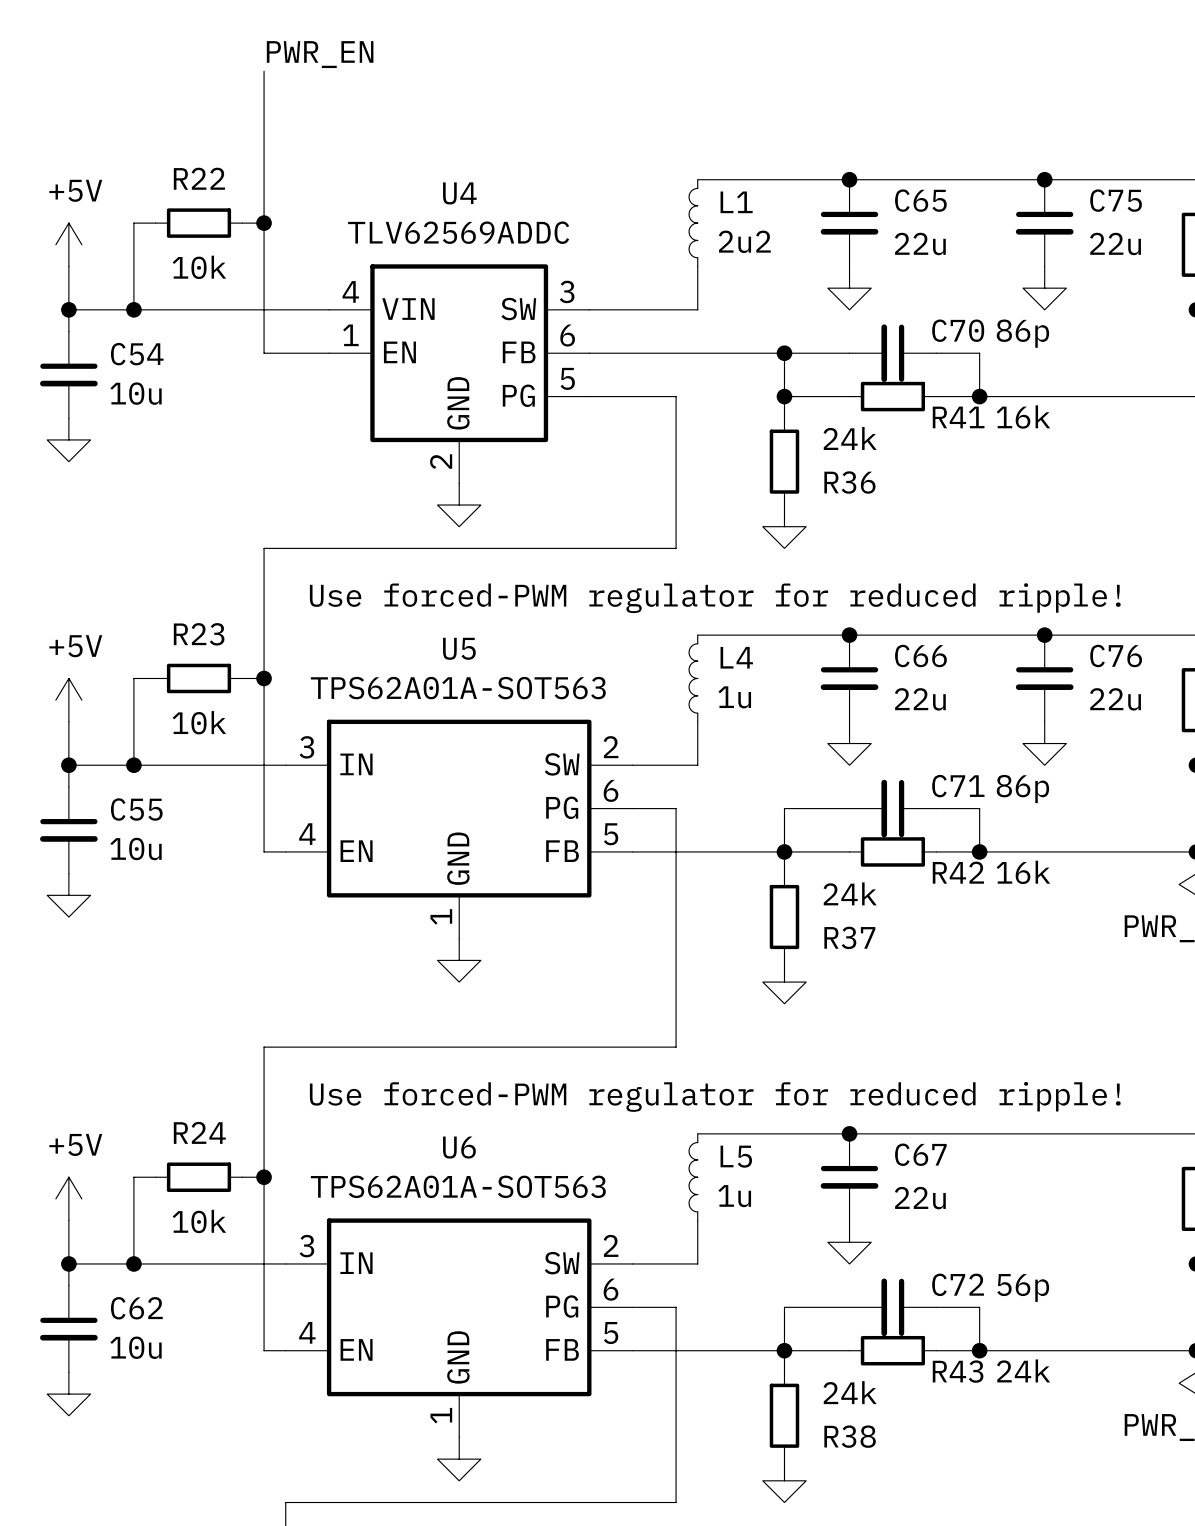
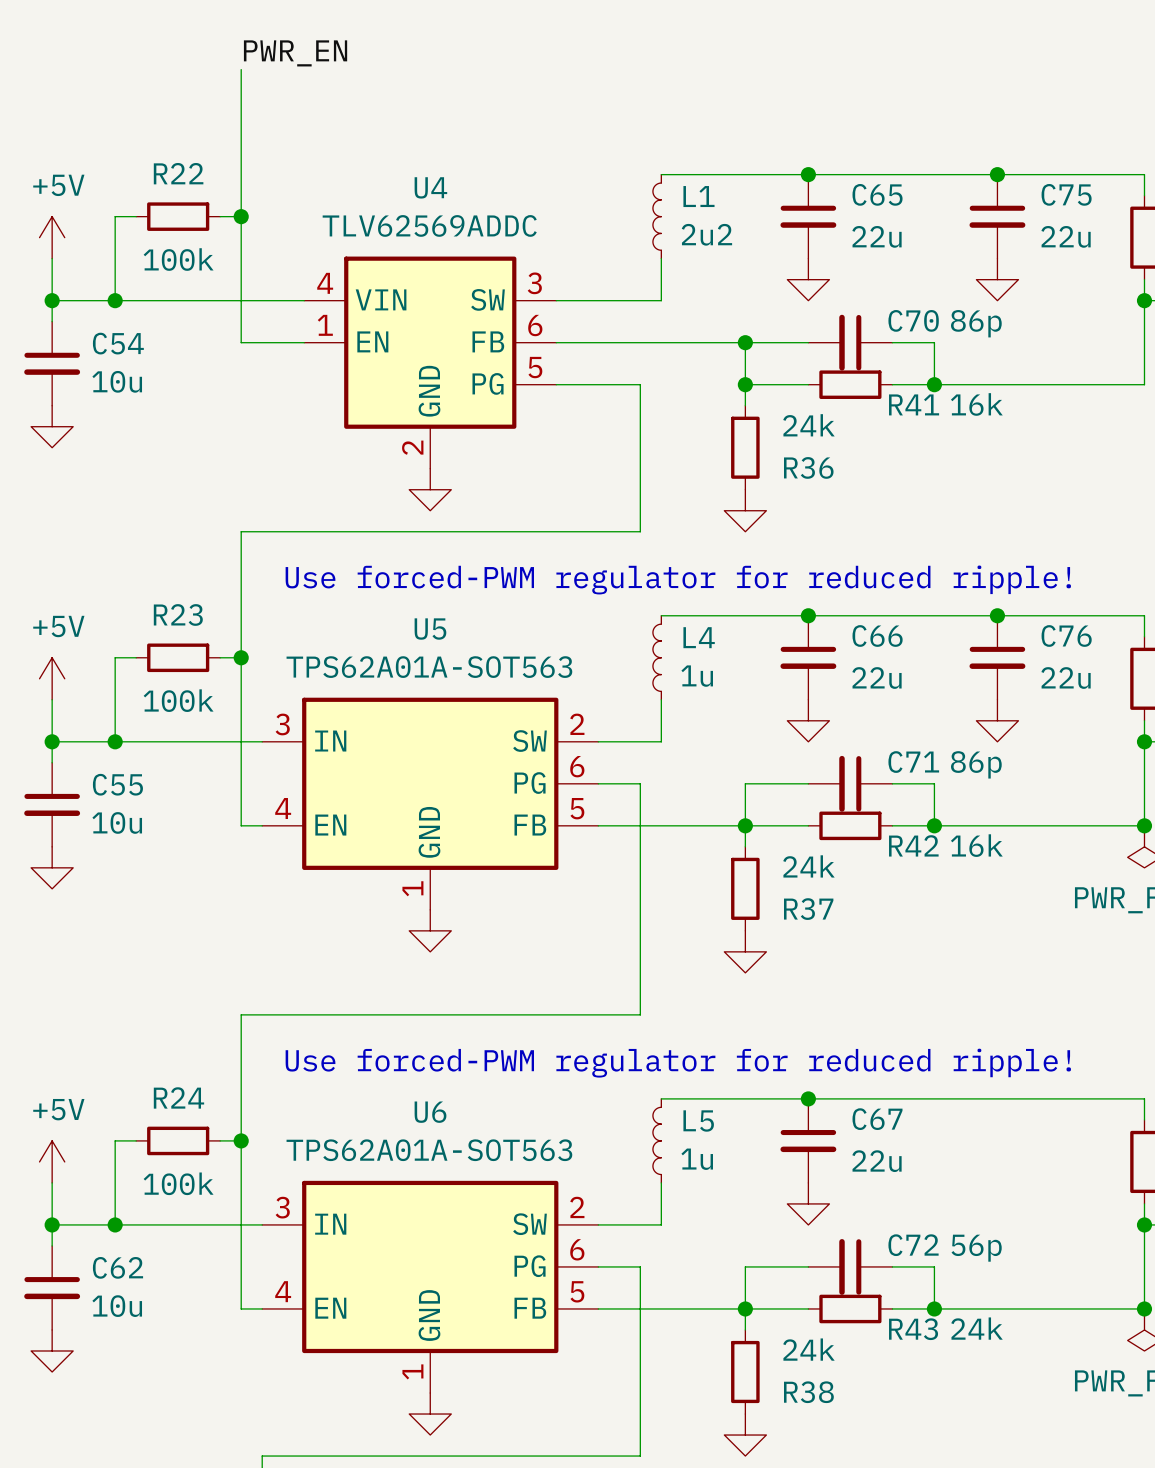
R22 value: 10k (199, 267) -> 100k (178, 259)
R23 value: 10k (199, 722) -> 100k (178, 700)
R24 value: 10k (199, 1221) -> 100k (178, 1183)

